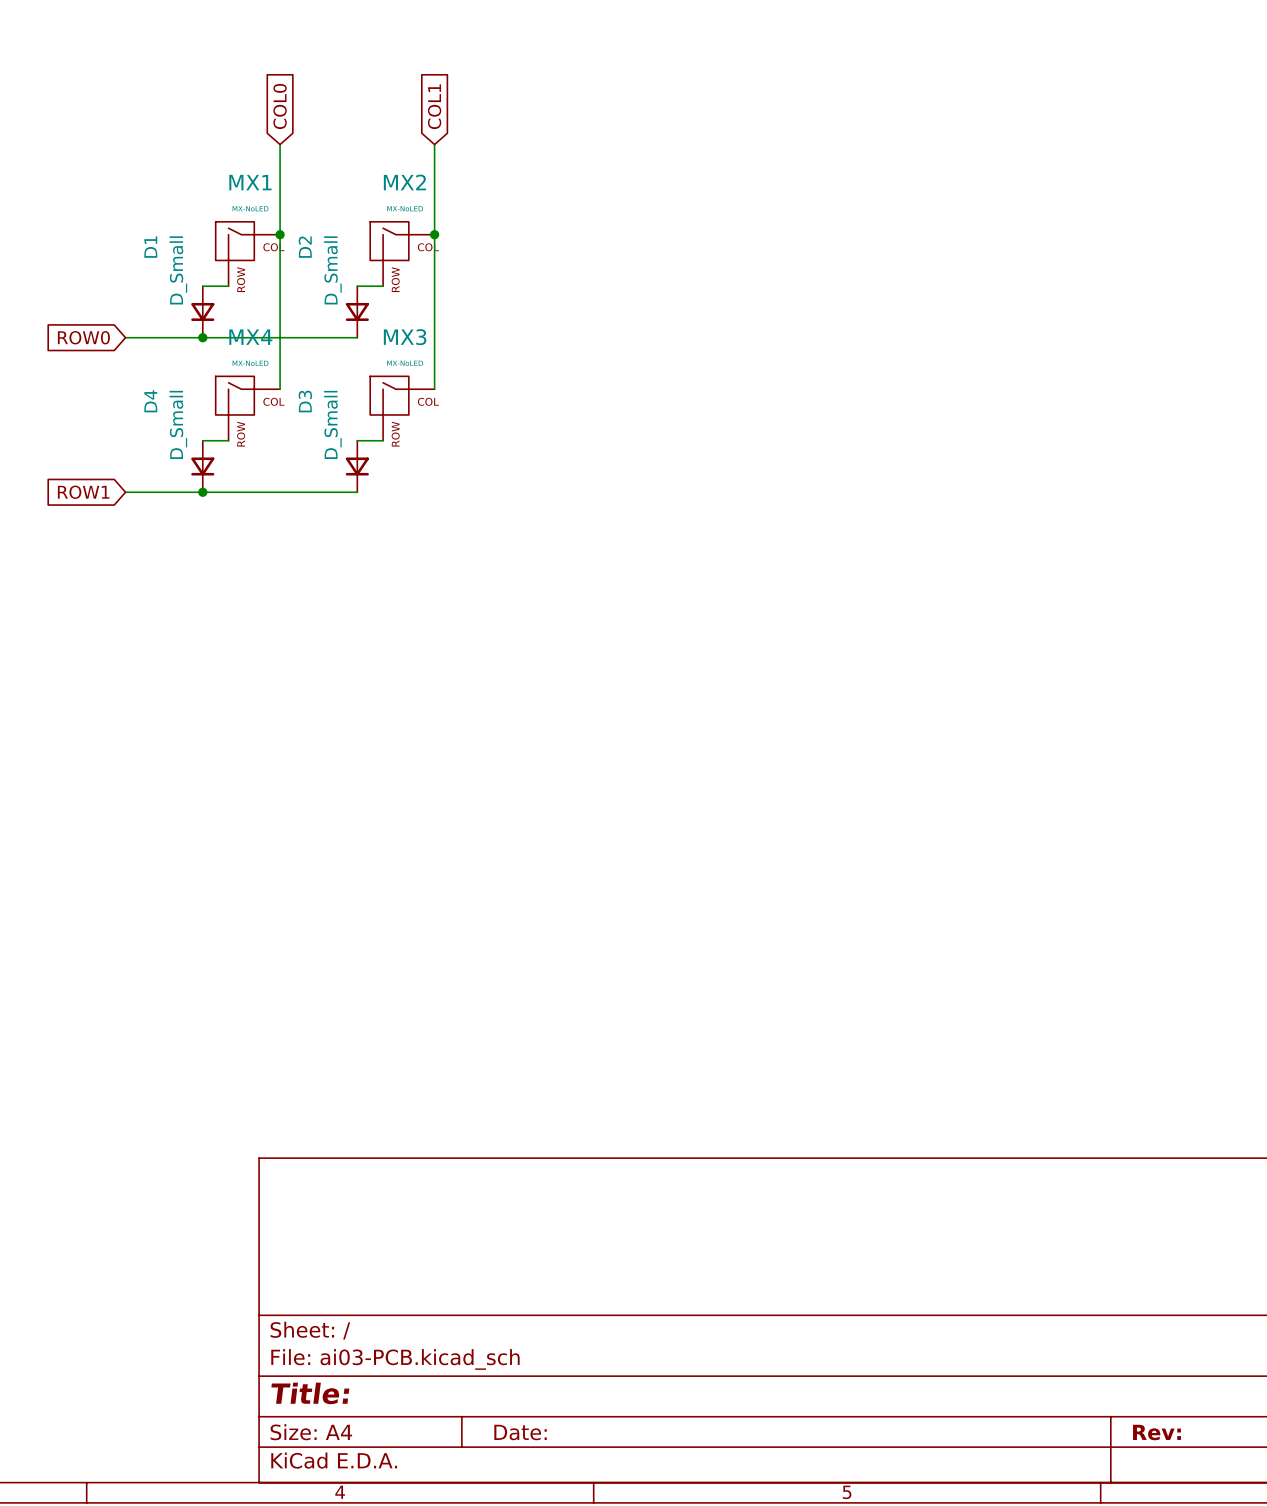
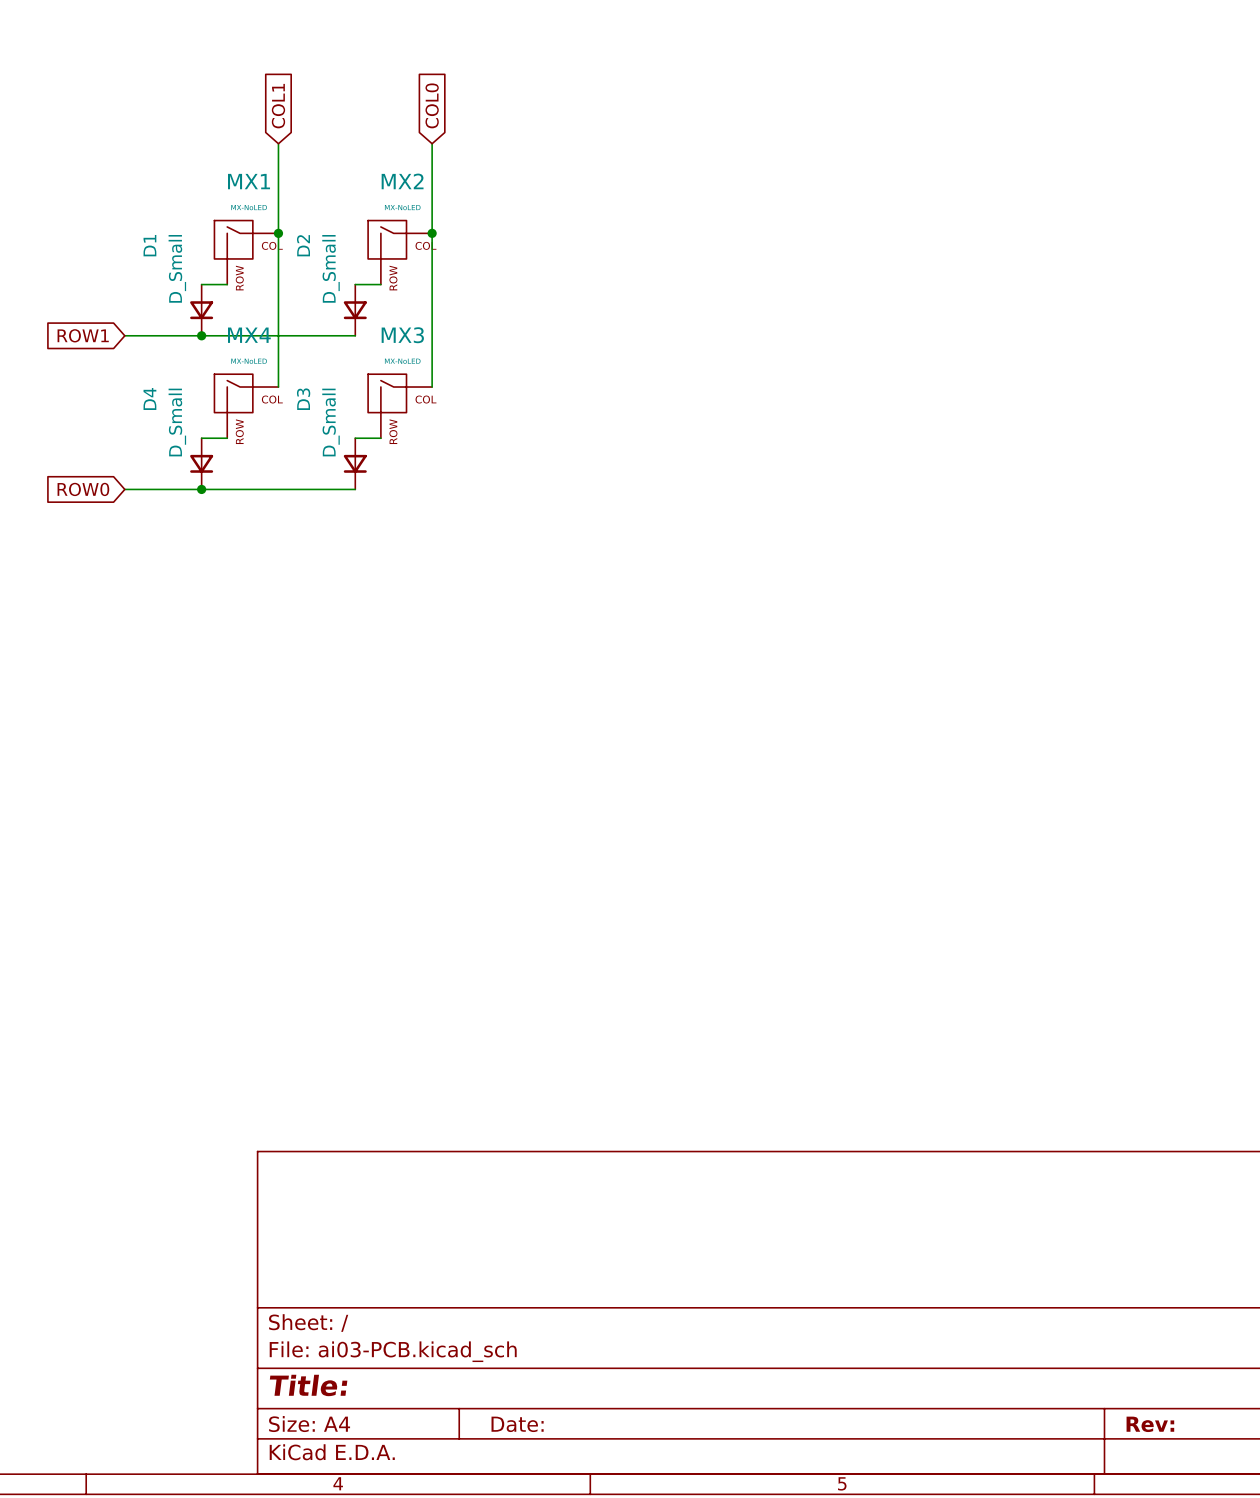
global label: COL0 (280, 106) -> COL1 (278, 106)
global label: COL1 (434, 106) -> COL0 (432, 105)
global label: ROW0 (83, 337) -> ROW1 (83, 335)
global label: ROW1 (83, 492) -> ROW0 (83, 489)

